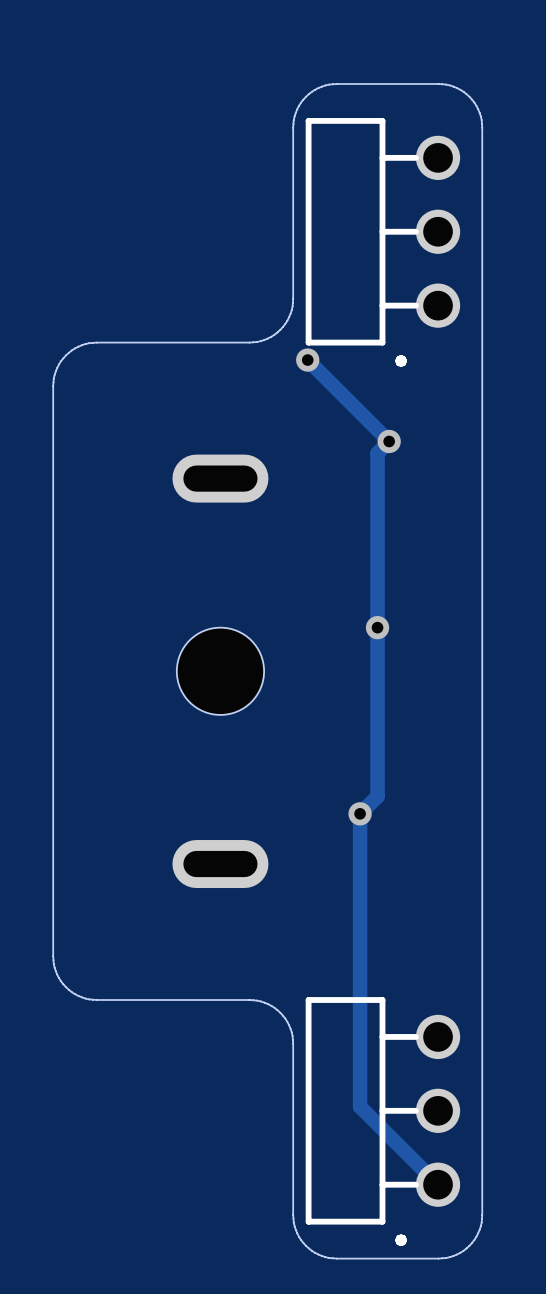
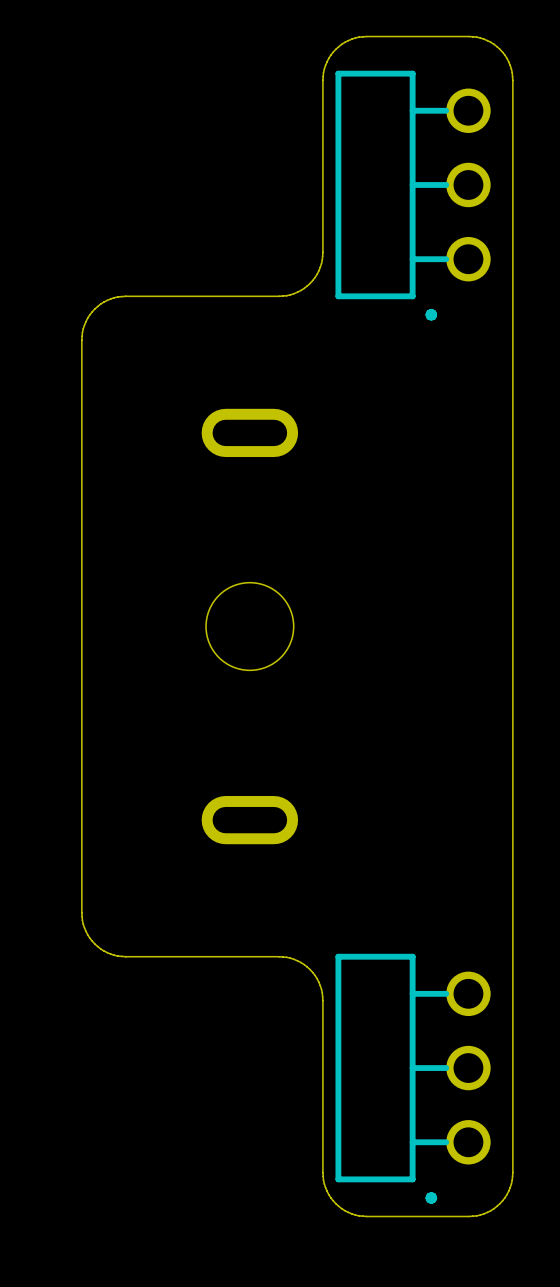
track: (307, 360) (389, 441) (377, 453) (377, 796) (360, 813) (360, 1106) (438, 1184) -> none
via: (307, 360) -> none
via: (389, 441) -> none
via: (377, 627) -> none
via: (360, 813) -> none

